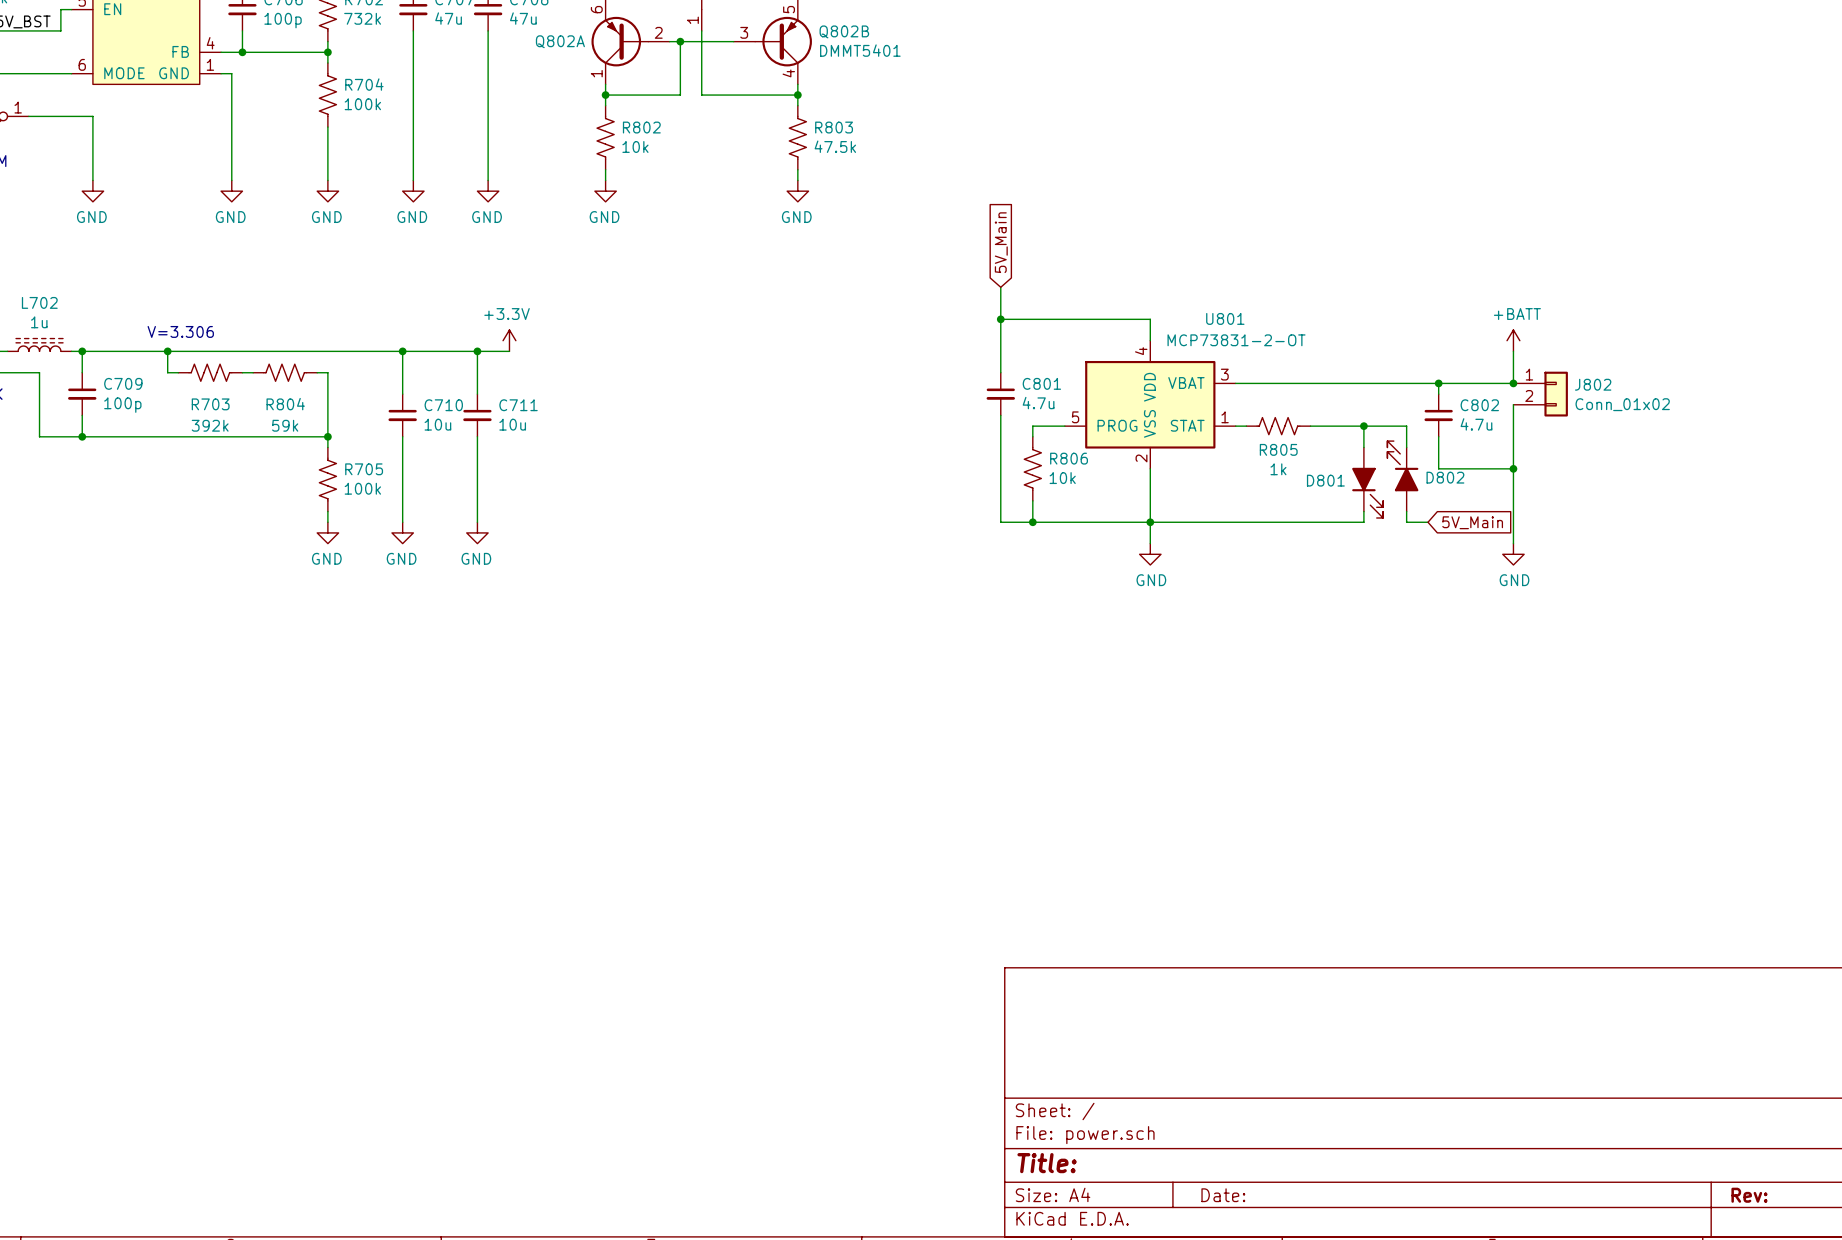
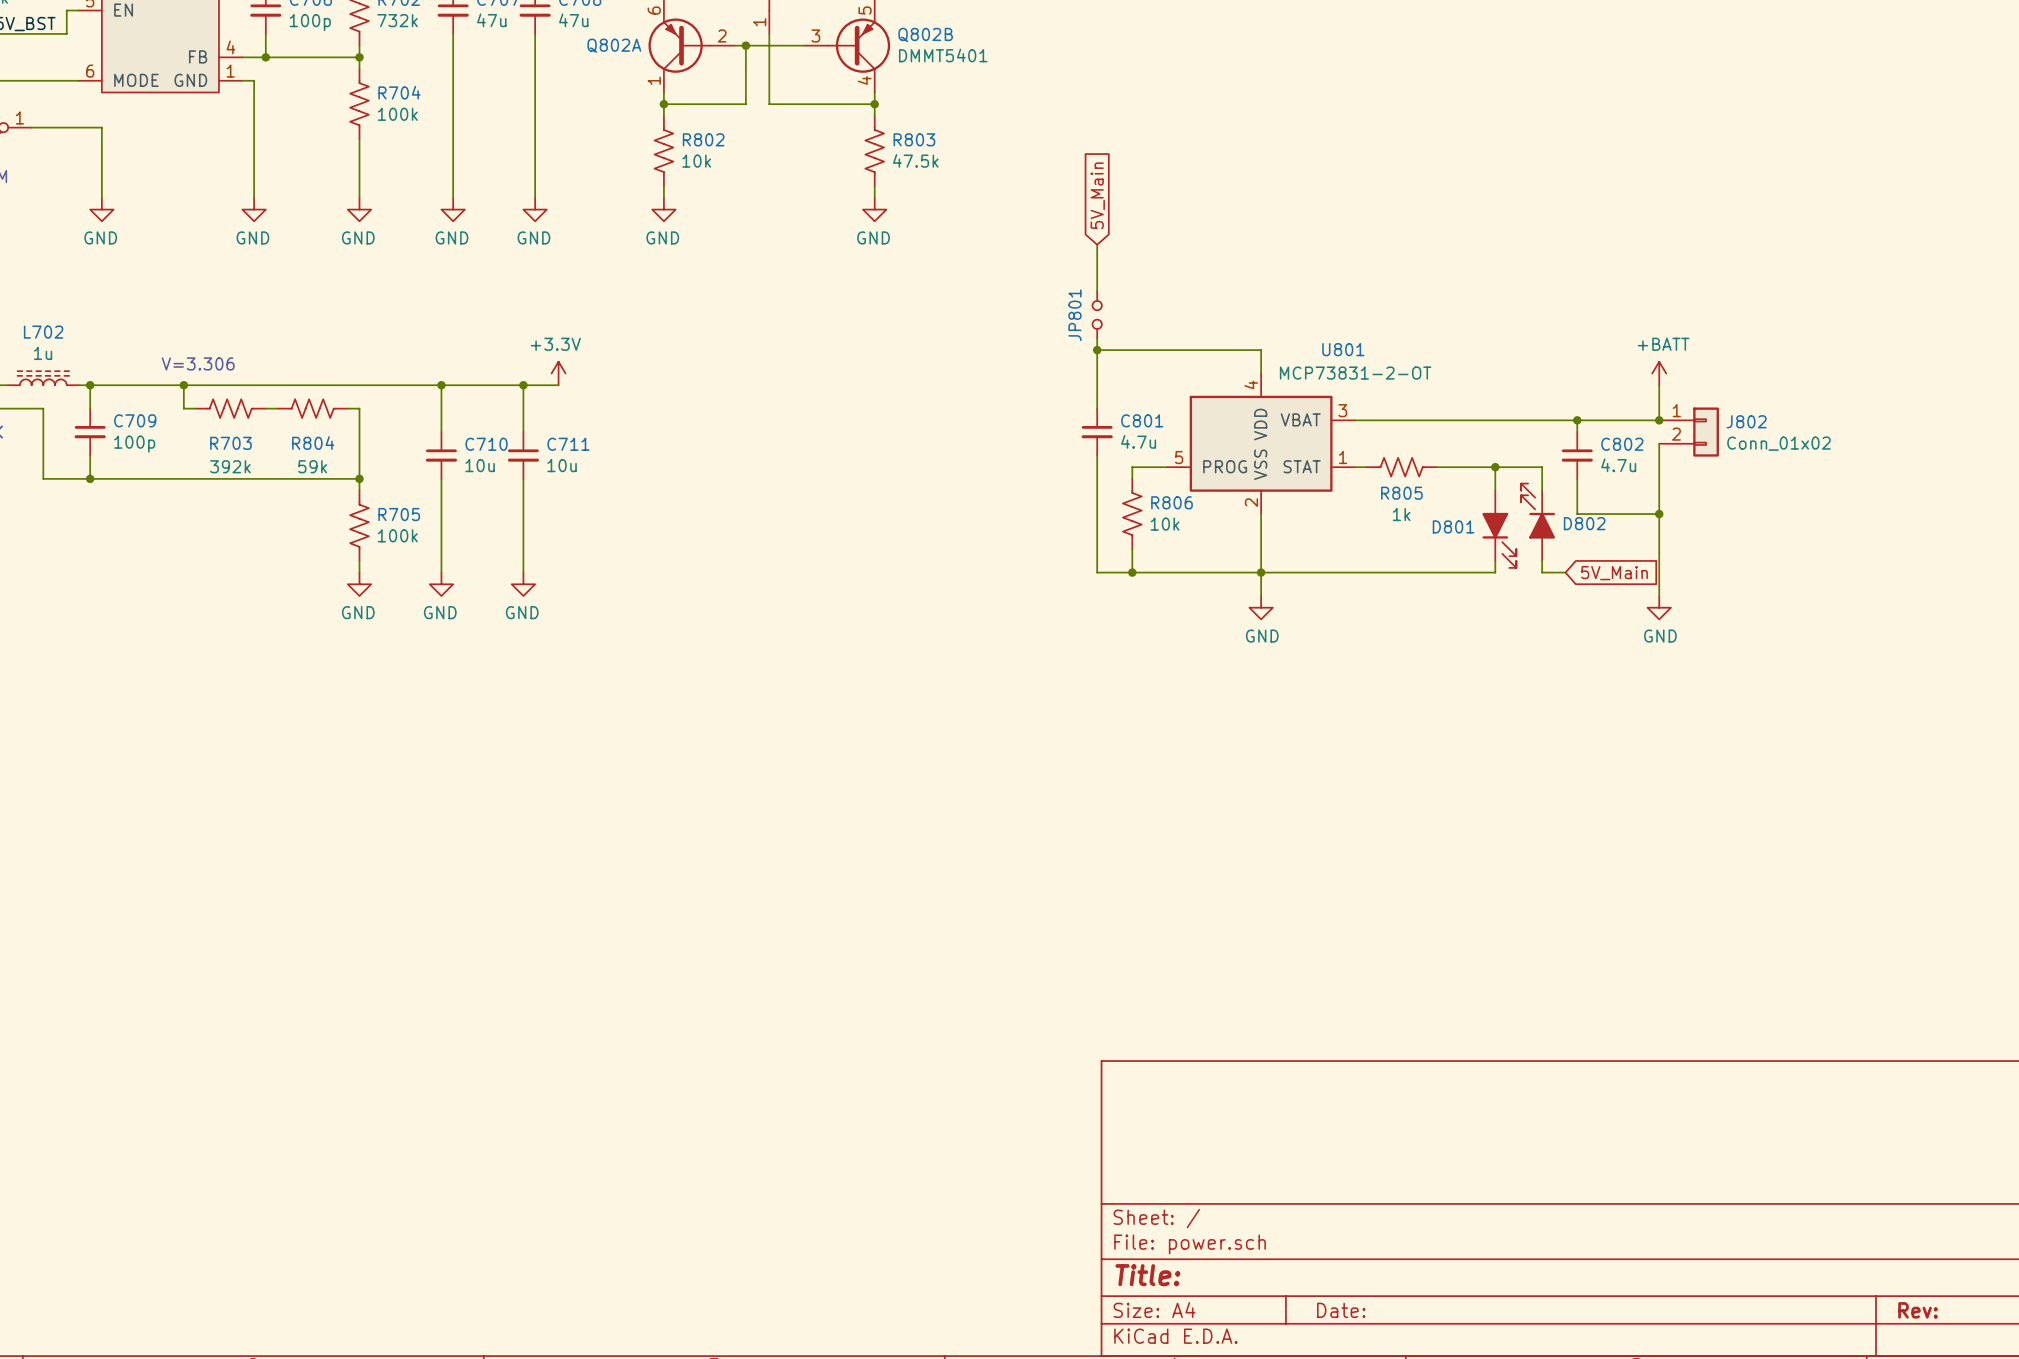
wire: none -> (1097, 244) (1097, 291)
global label position: 5V_Main (1001, 242) -> 5V_Main (1097, 195)
wire: (1000, 287) (1000, 308) -> none
JP801: none -> (1097, 314)

